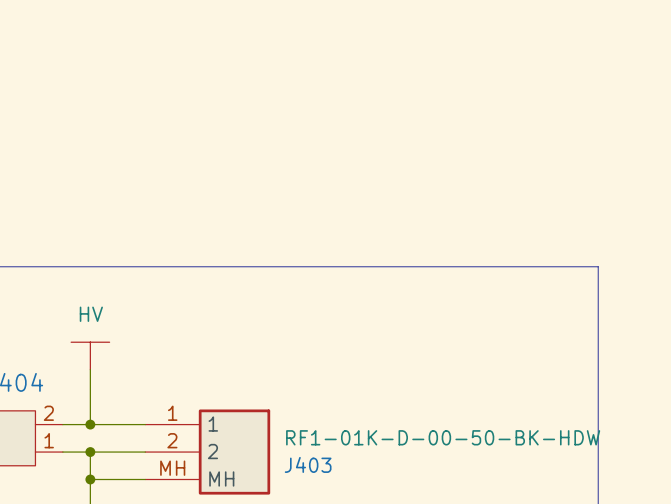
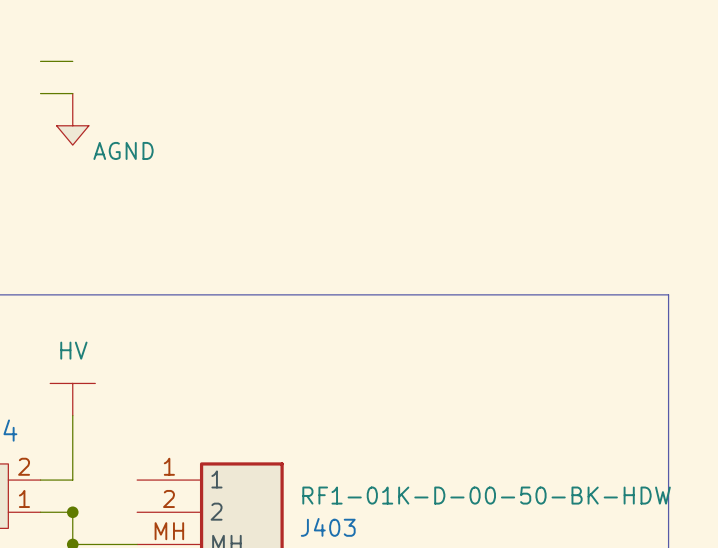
wire: none -> (40, 61) (72, 61)
wire: none -> (40, 93) (72, 93)
power symbol: none -> AGND (72, 119)
wire: (90, 424) (145, 424) -> none
junction: (90, 424) -> none
wire: (90, 452) (145, 452) -> none

